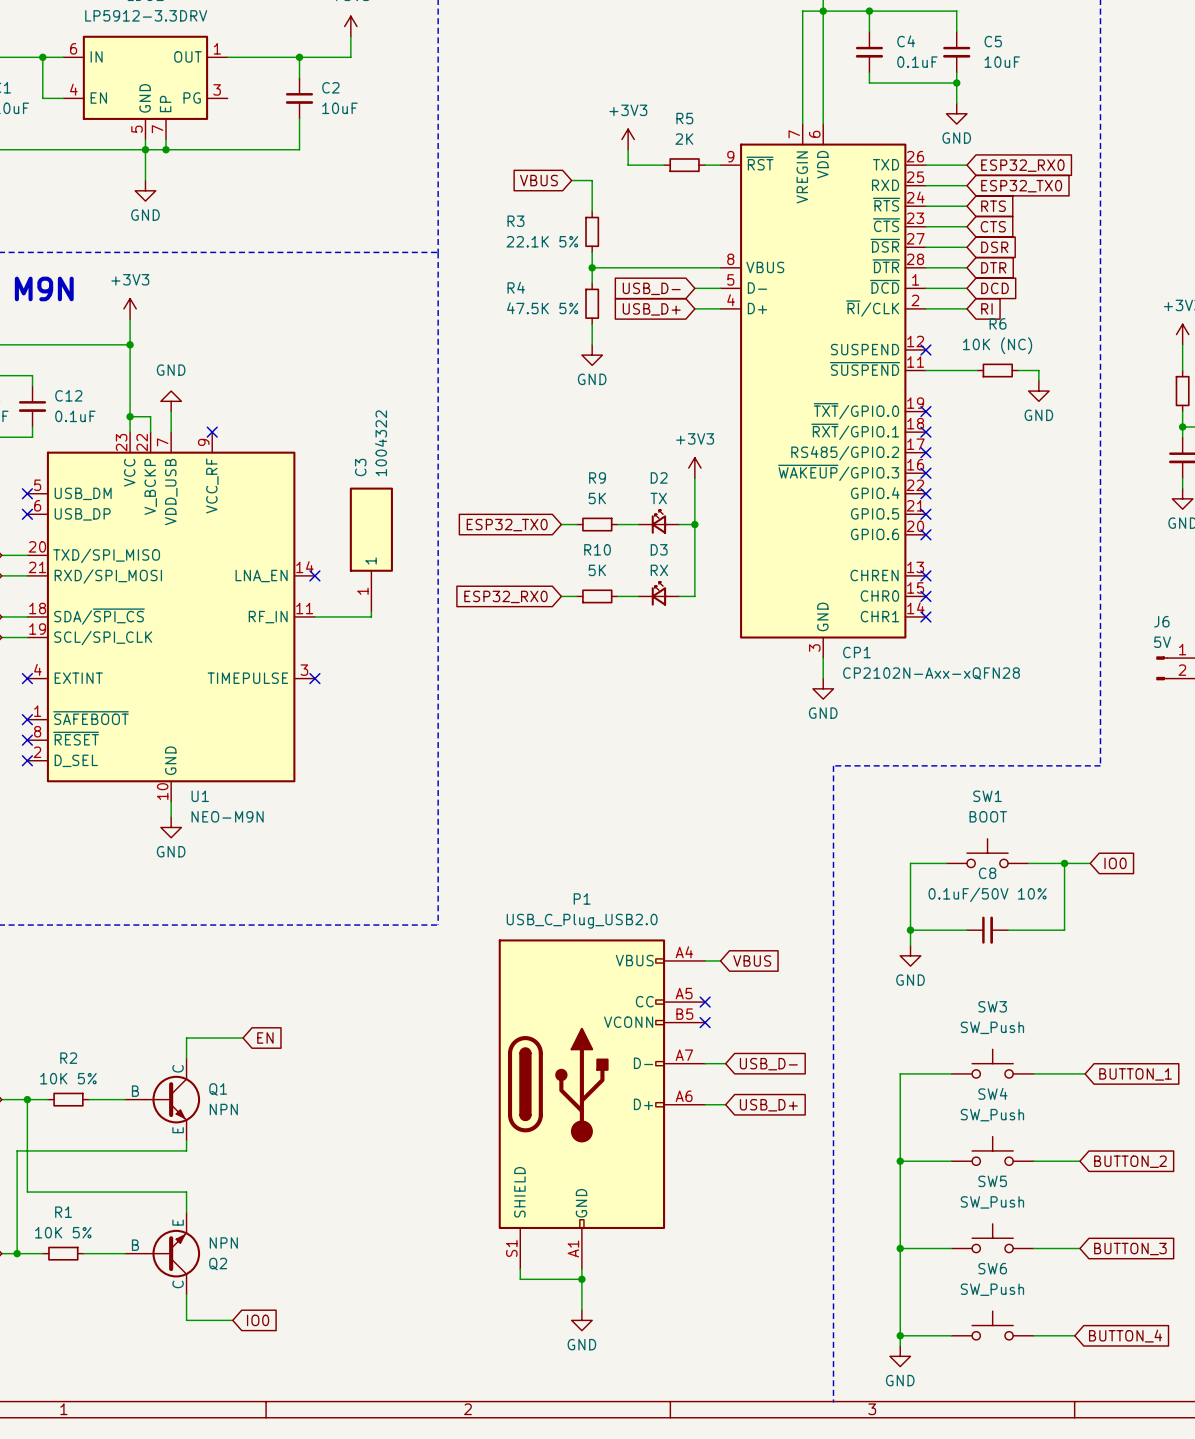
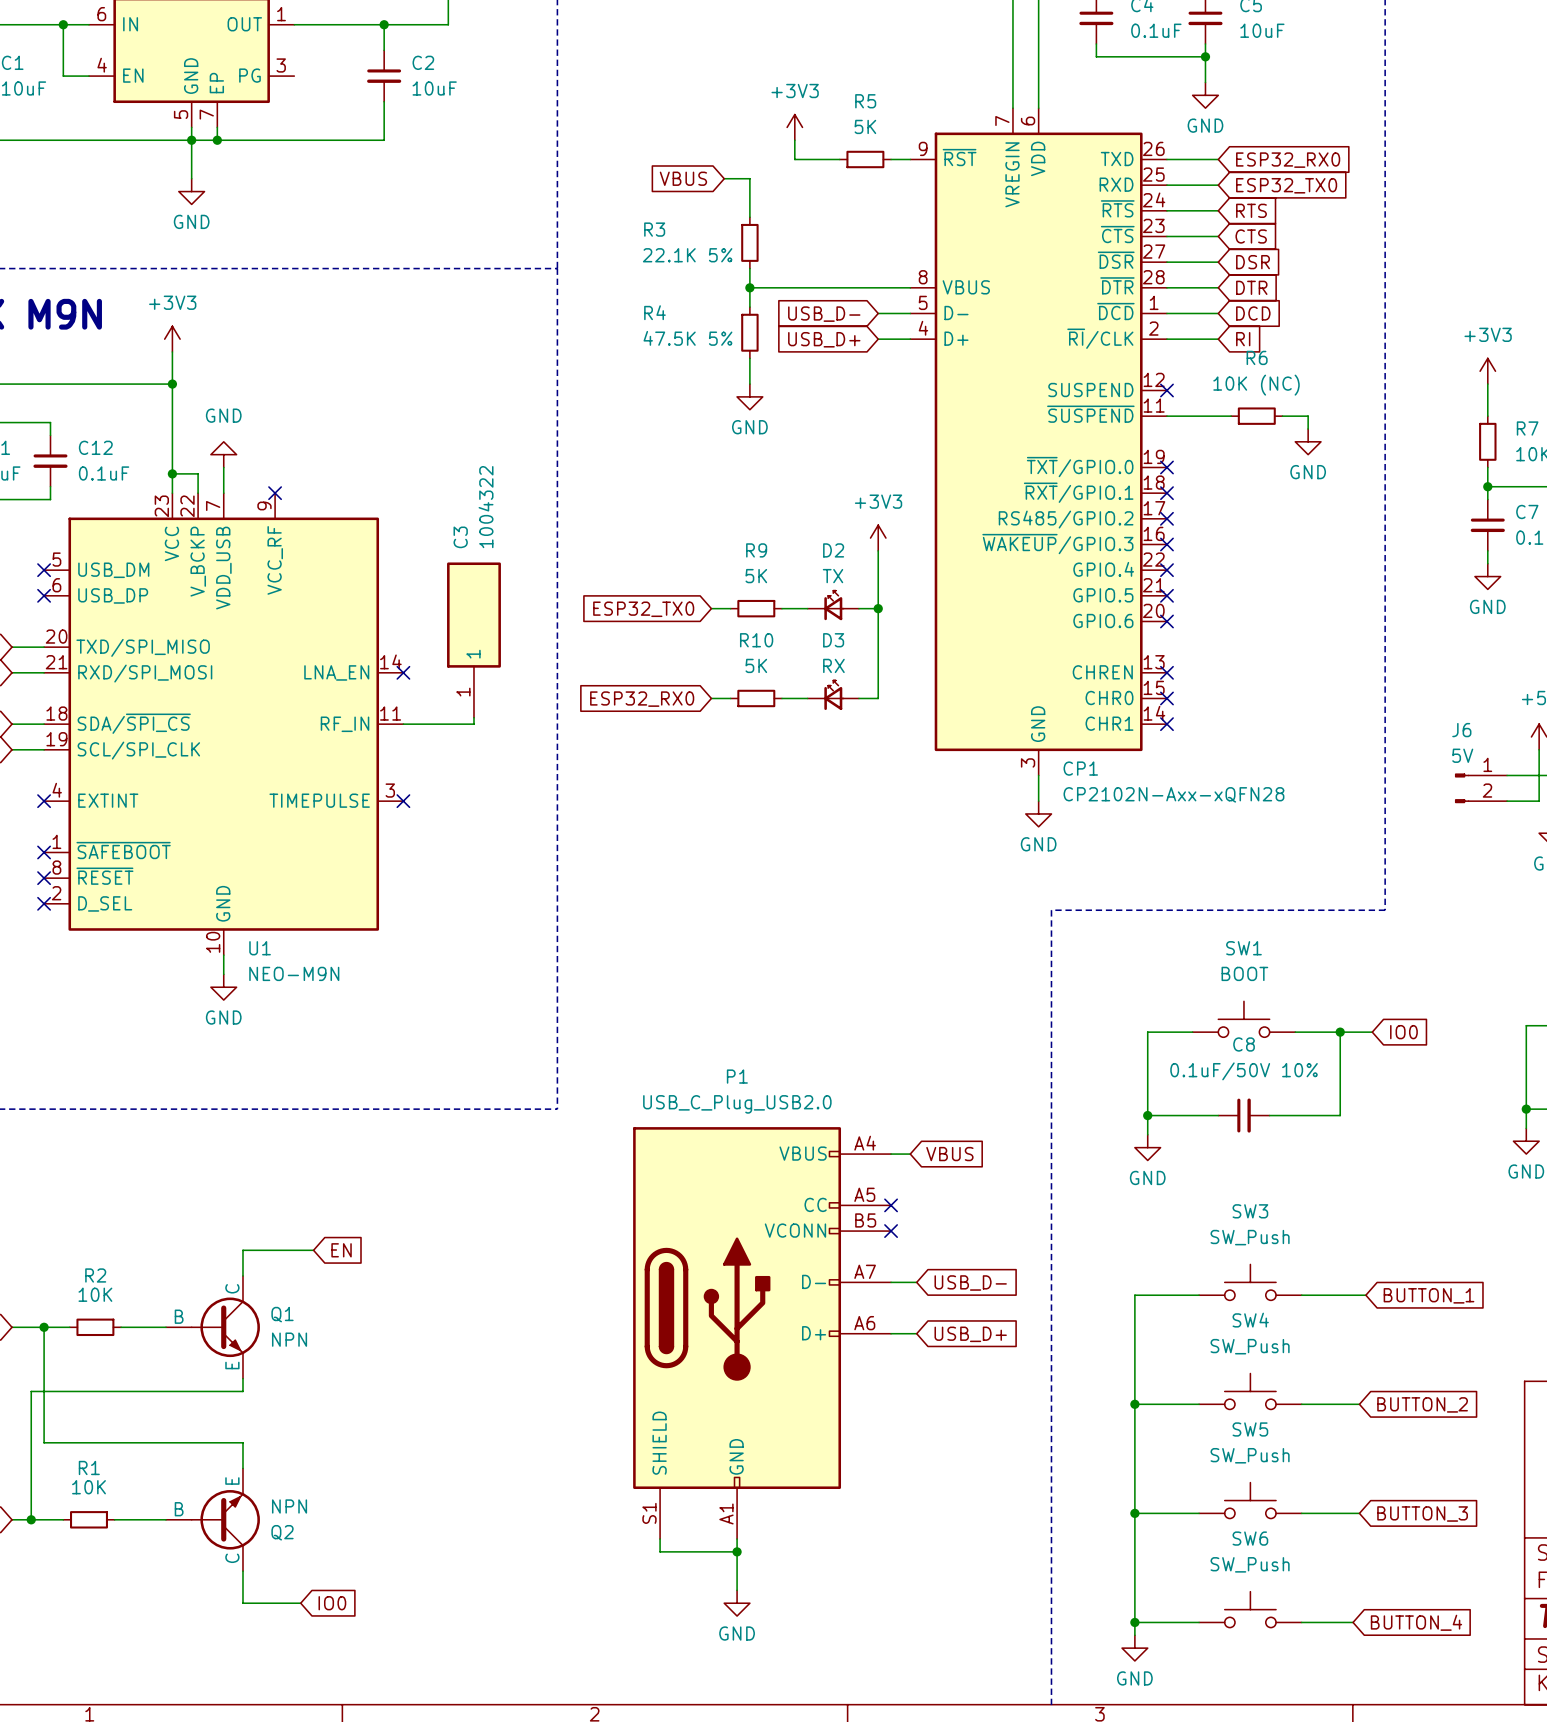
R5 value: 2K (684, 139) -> 5K (865, 126)
R2 value: 10K 5% (68, 1078) -> 10K (95, 1294)
R1 value: 10K 5% (63, 1232) -> 10K (88, 1487)

